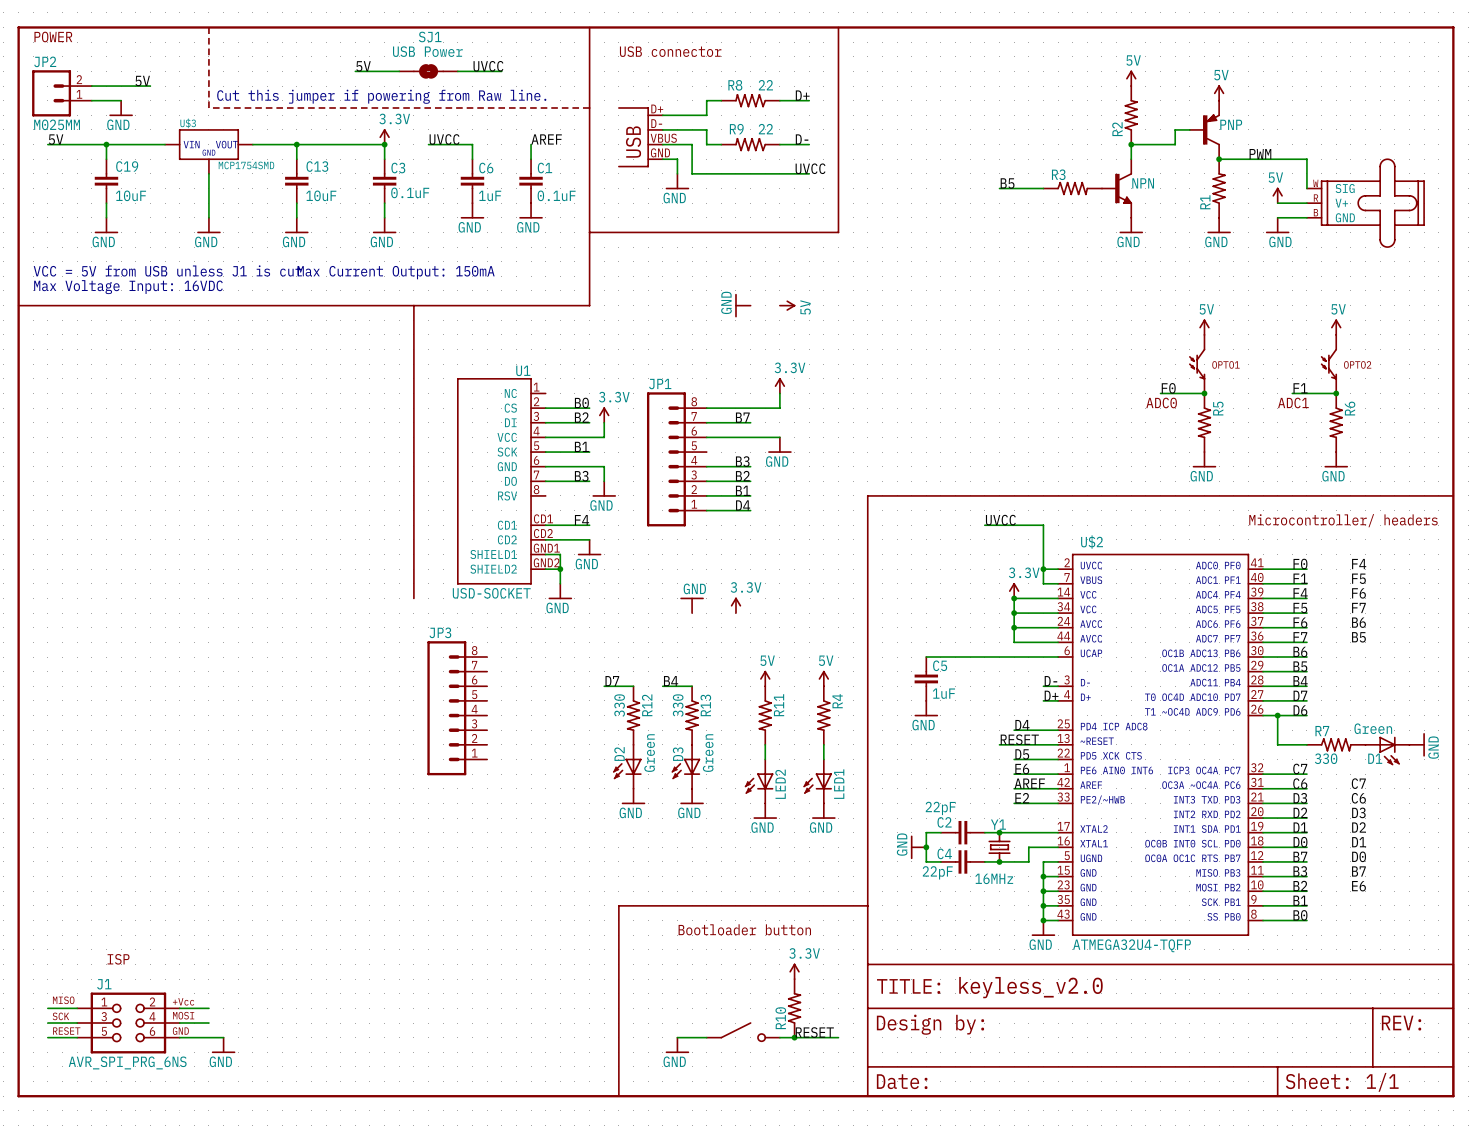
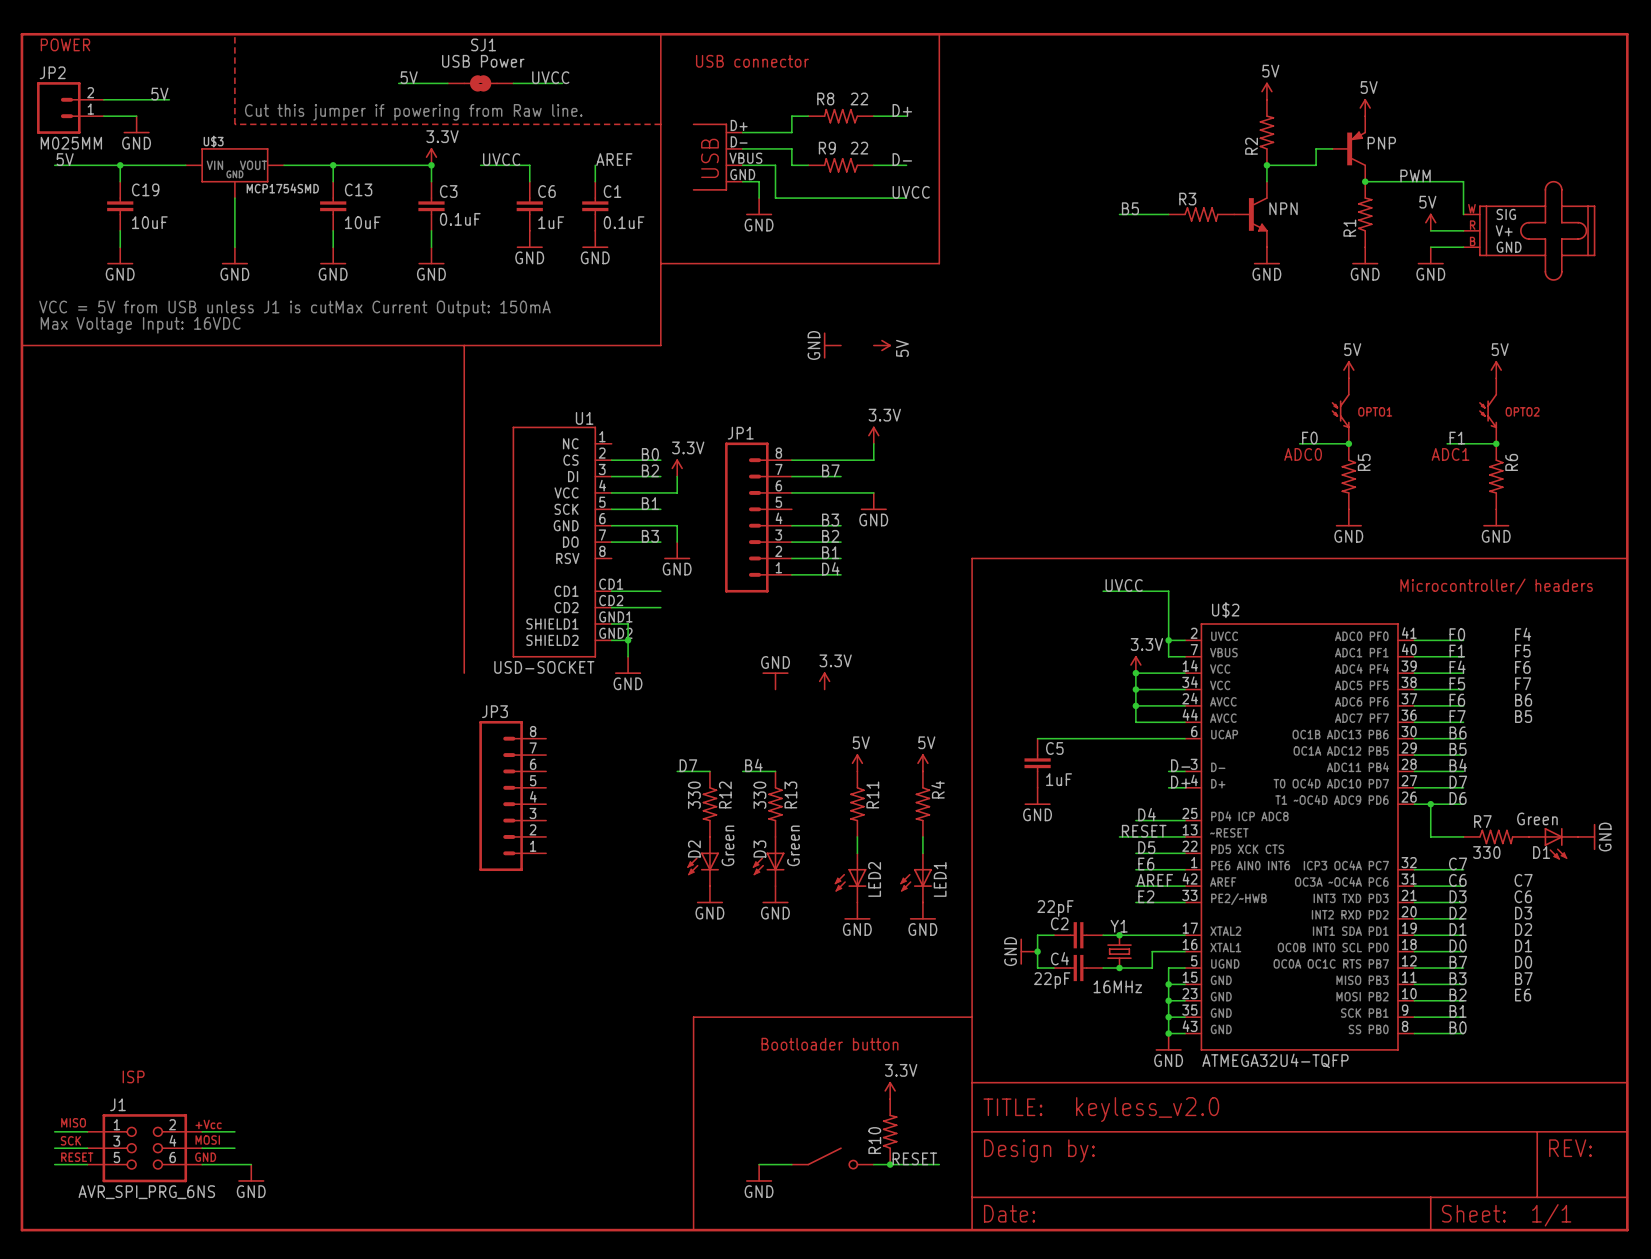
label: F4 (582, 520) -> none
power symbol: GND (589, 547) -> none

